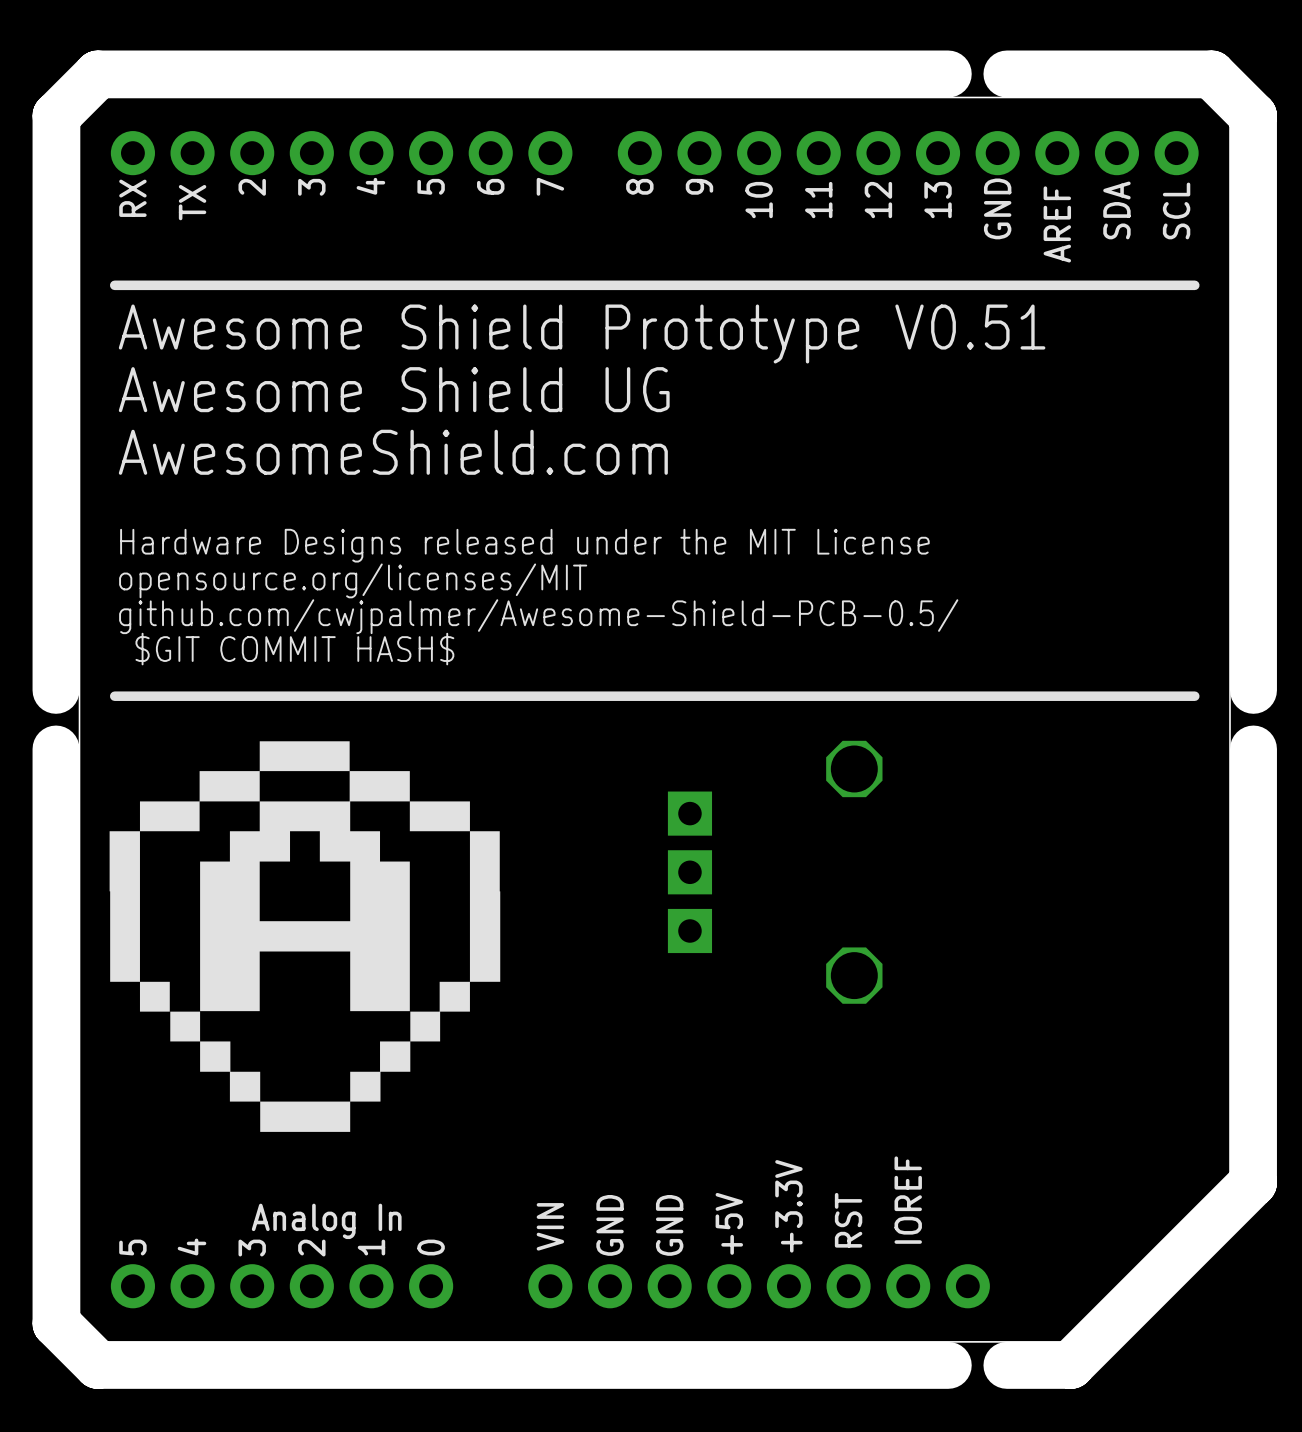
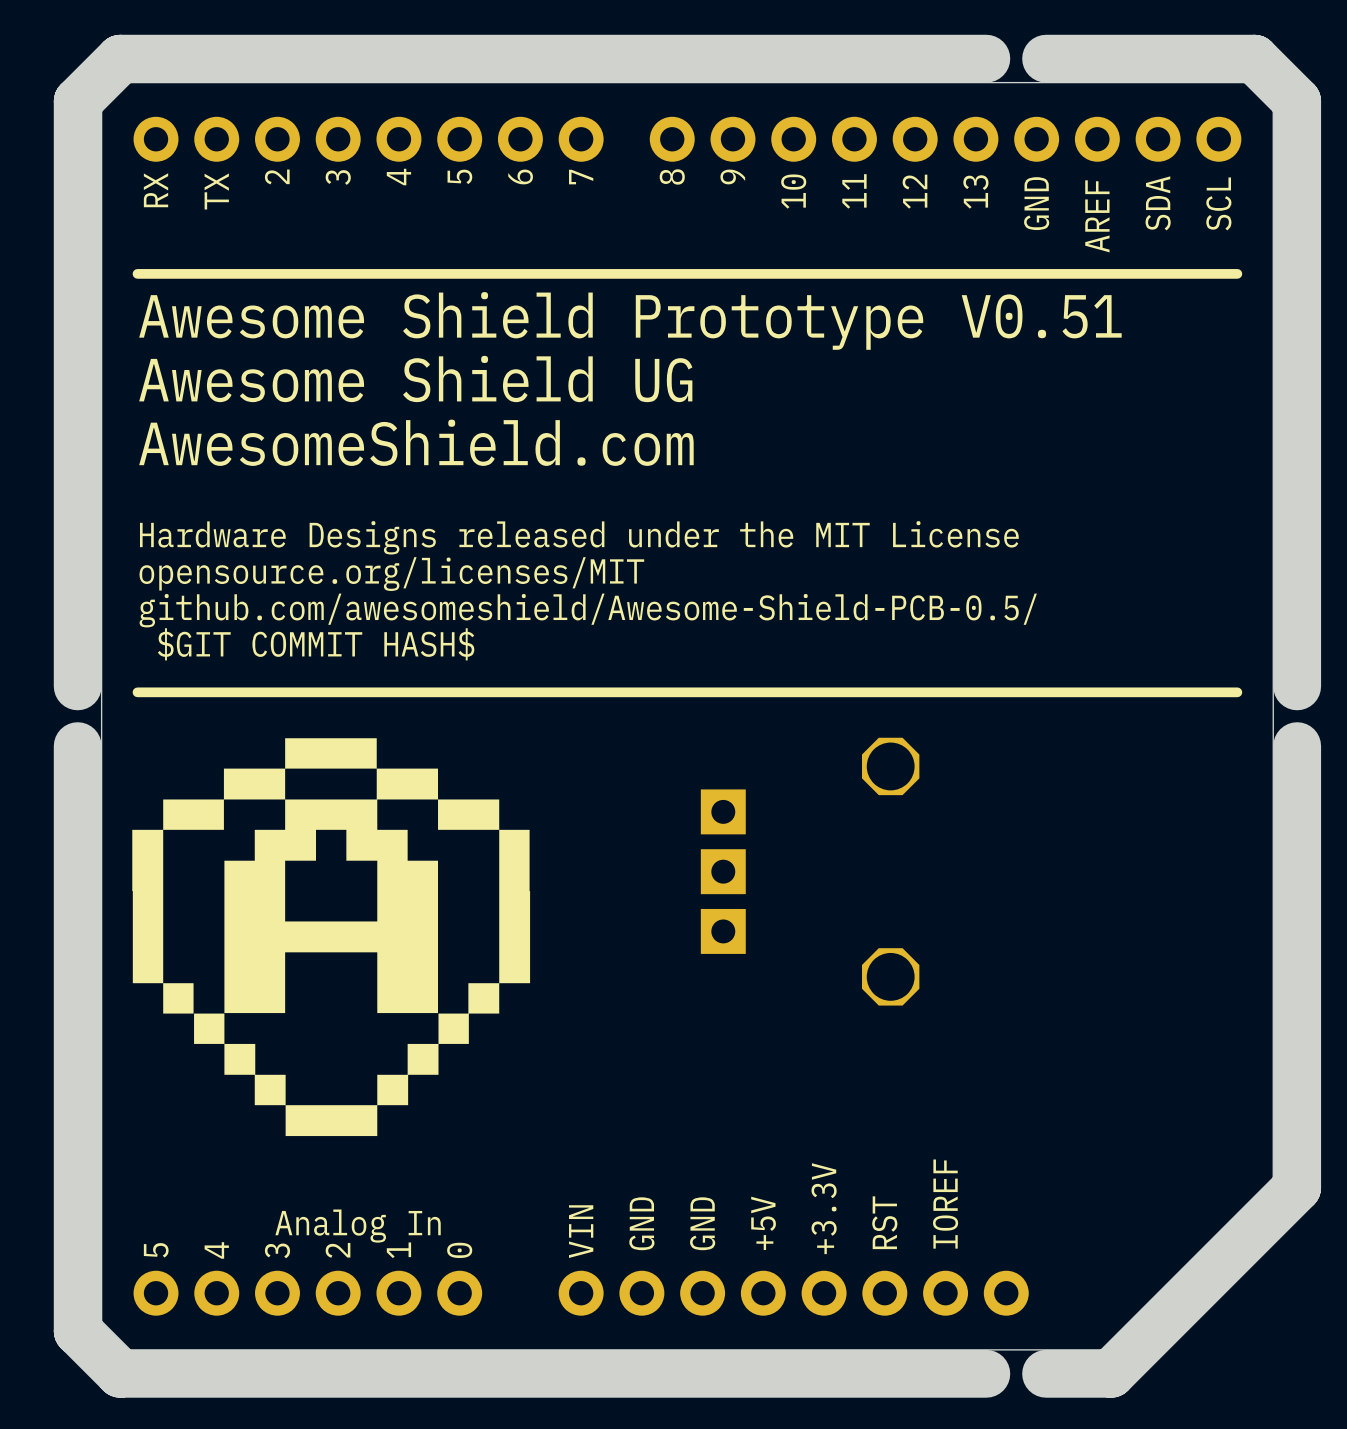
text: github.com/cwjpalmer/Awesome-Shield-PCB-0.5/ (538, 616) -> github.com/awesomeshield/Awesome-Shield-PCB-0.5/ (588, 610)

